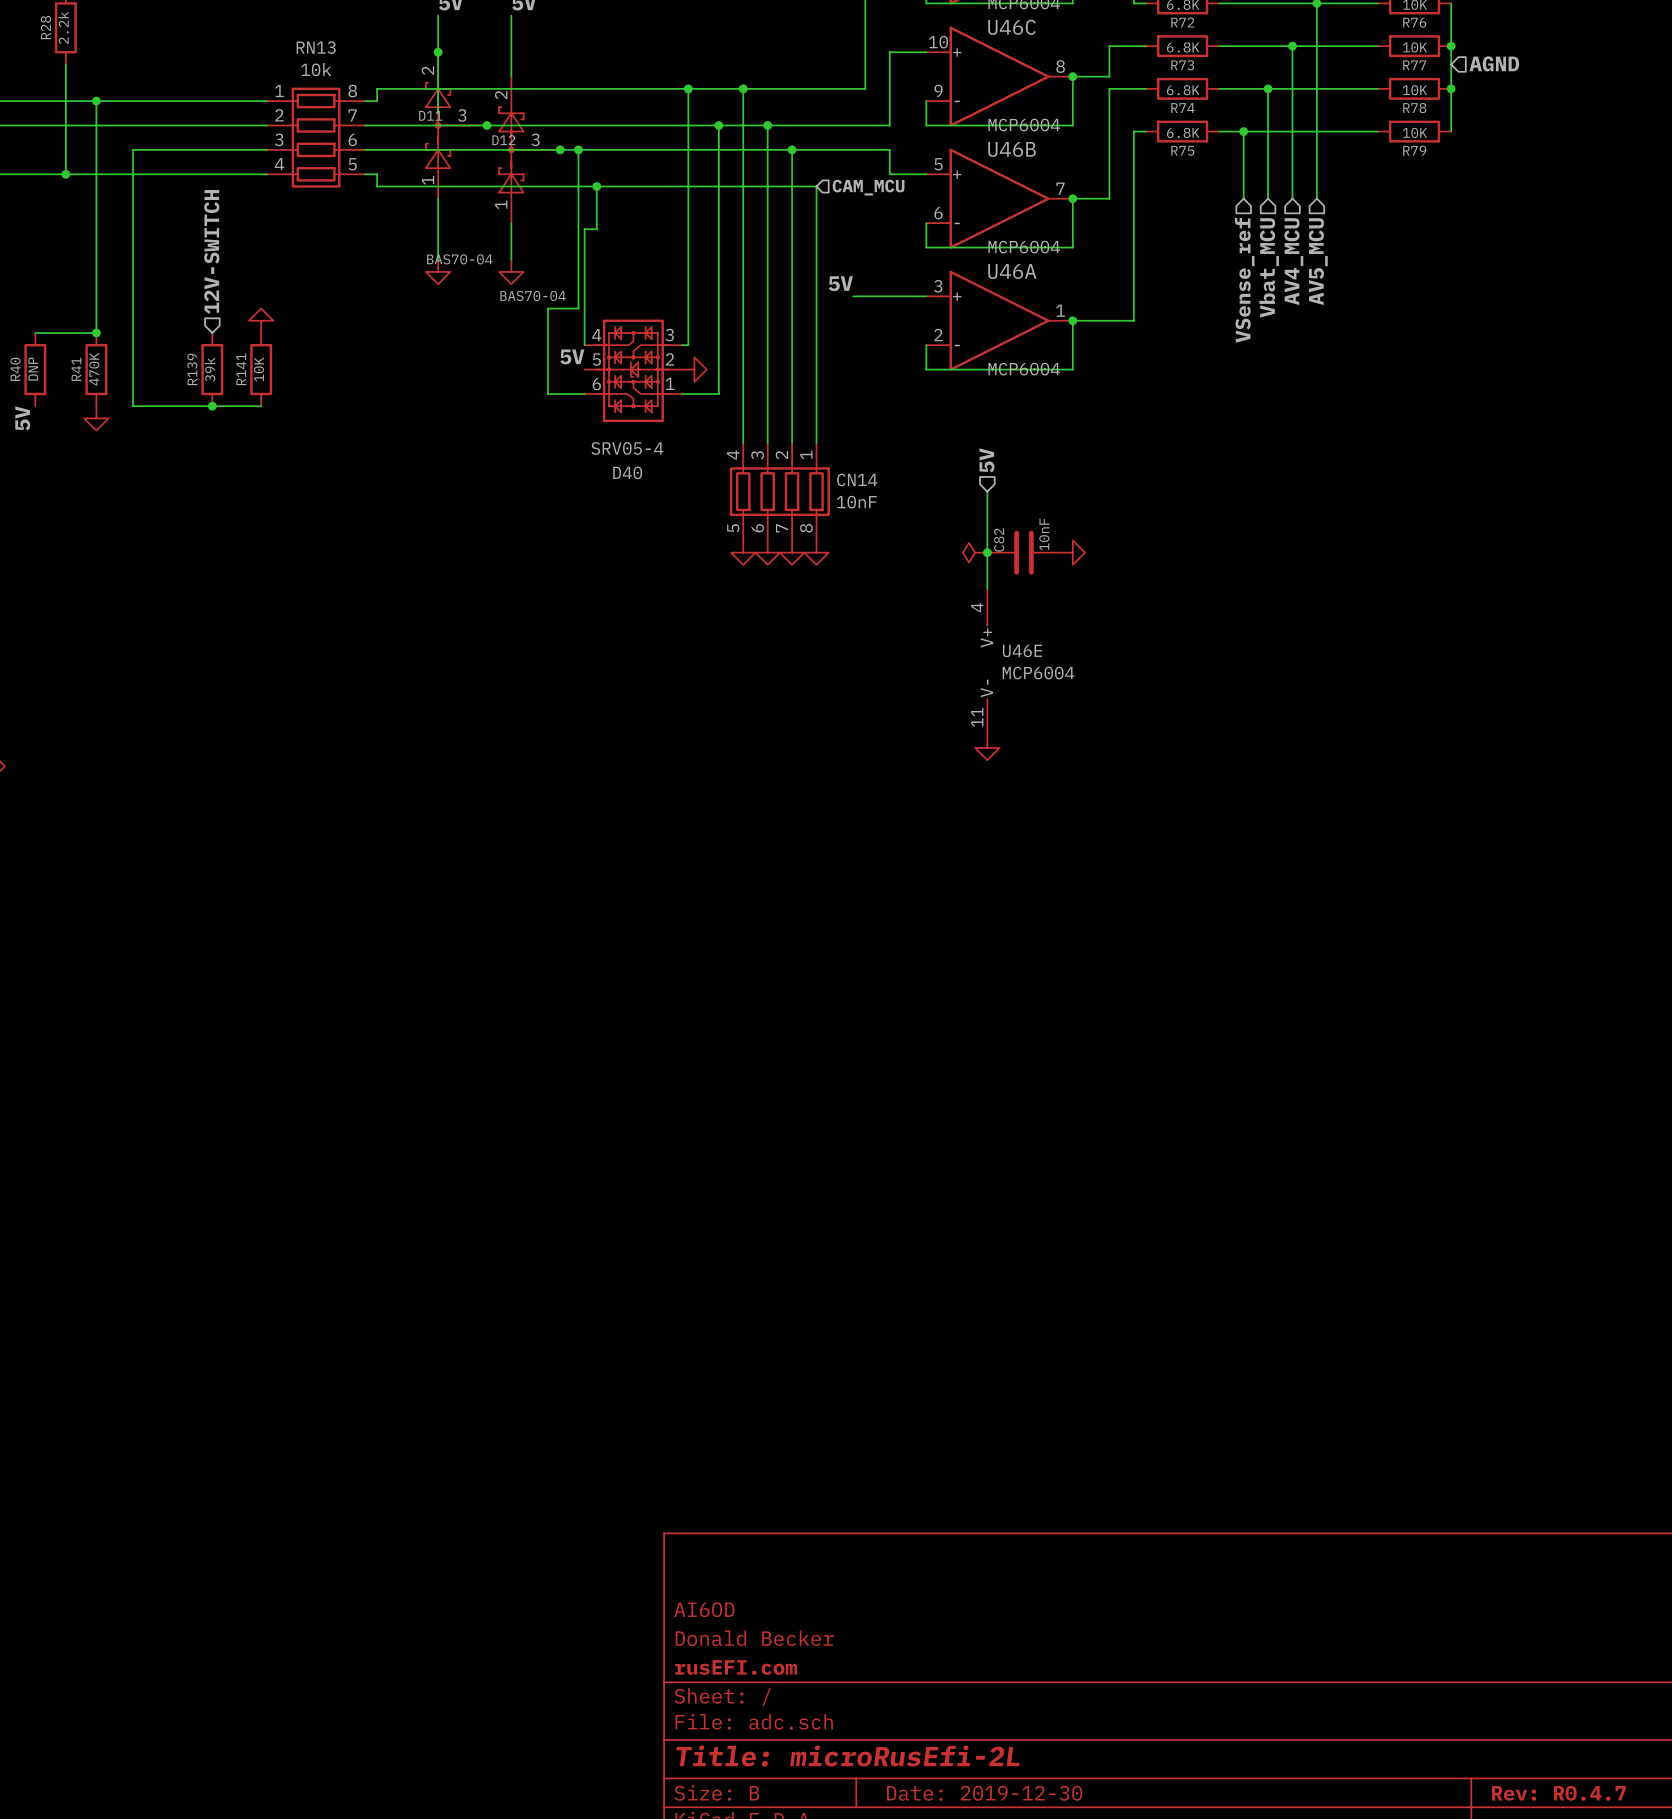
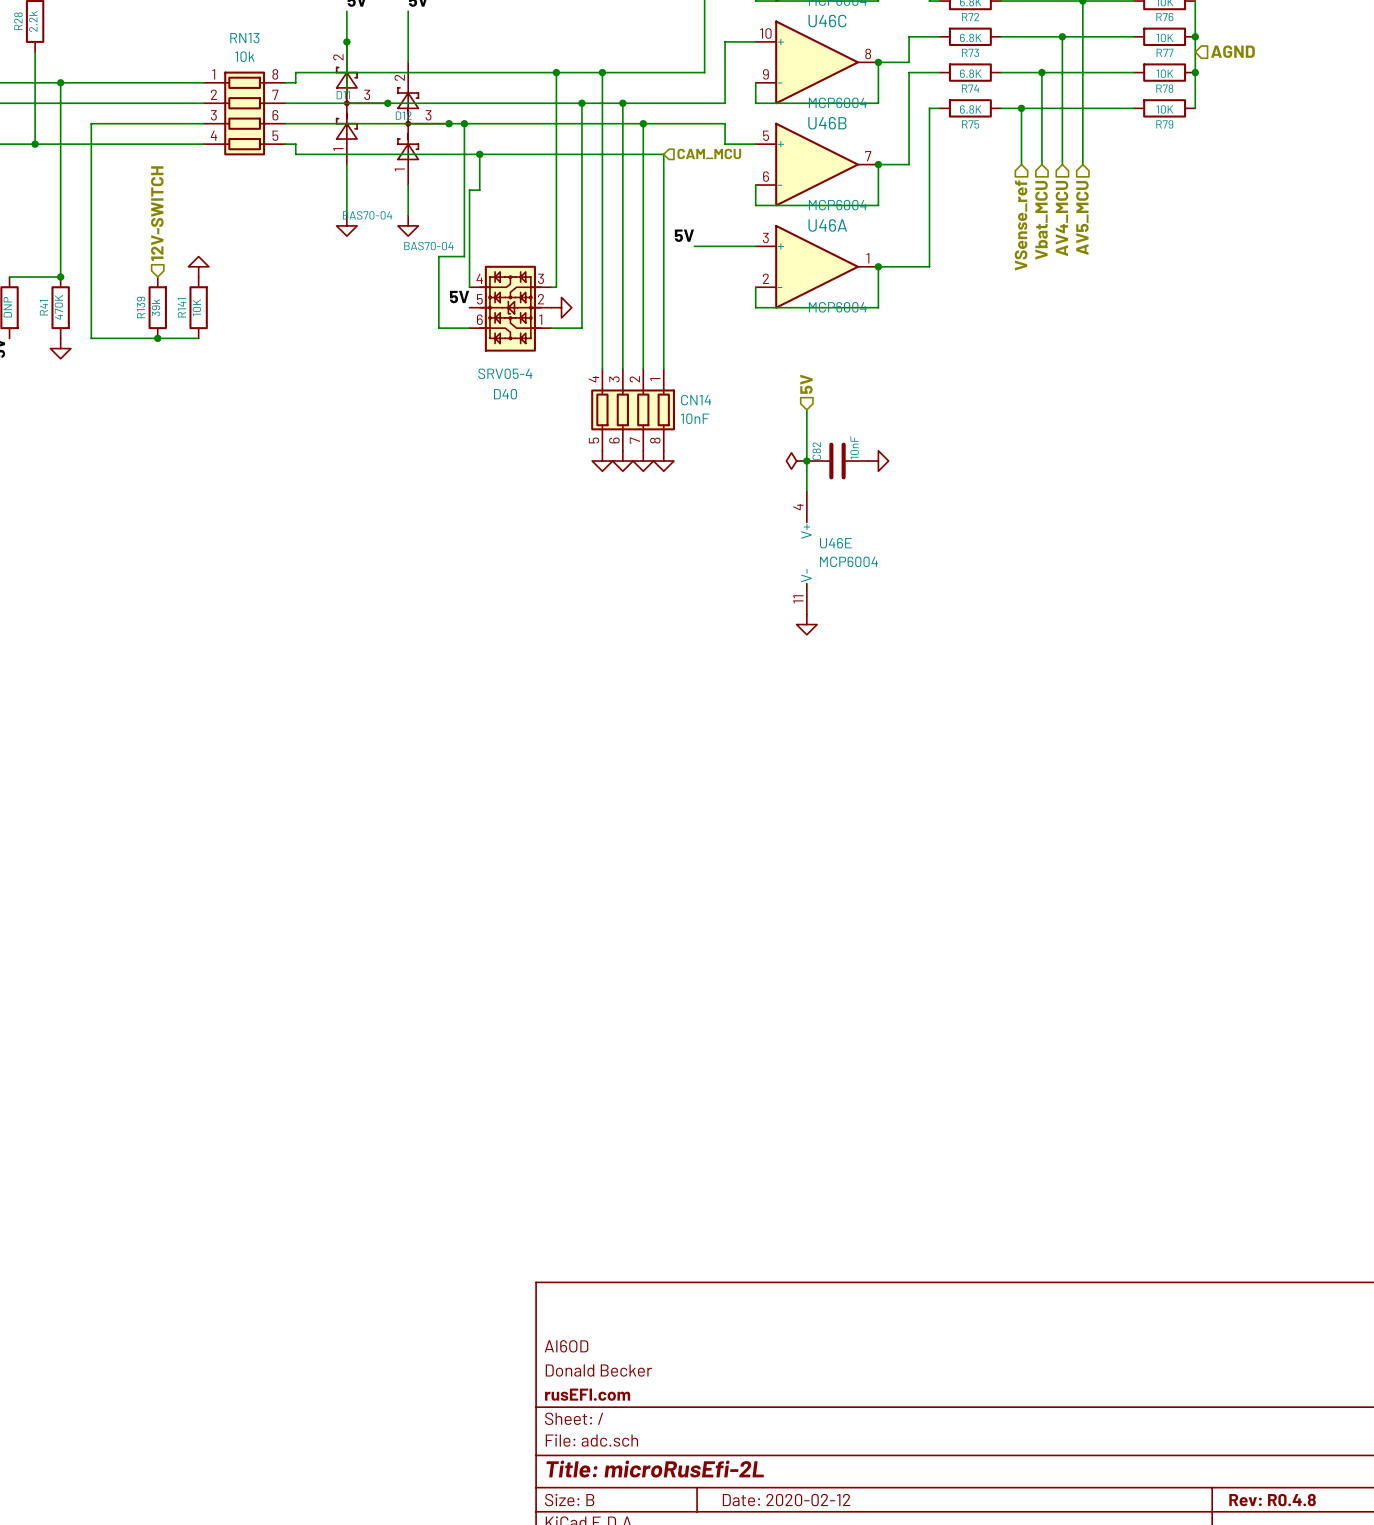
title block: Date: 2019-12-30 (984, 1793) -> Date: 2020-02-12 (786, 1500)
title block: Rev: R0.4.7 (1559, 1793) -> Rev: R0.4.8 (1272, 1500)

